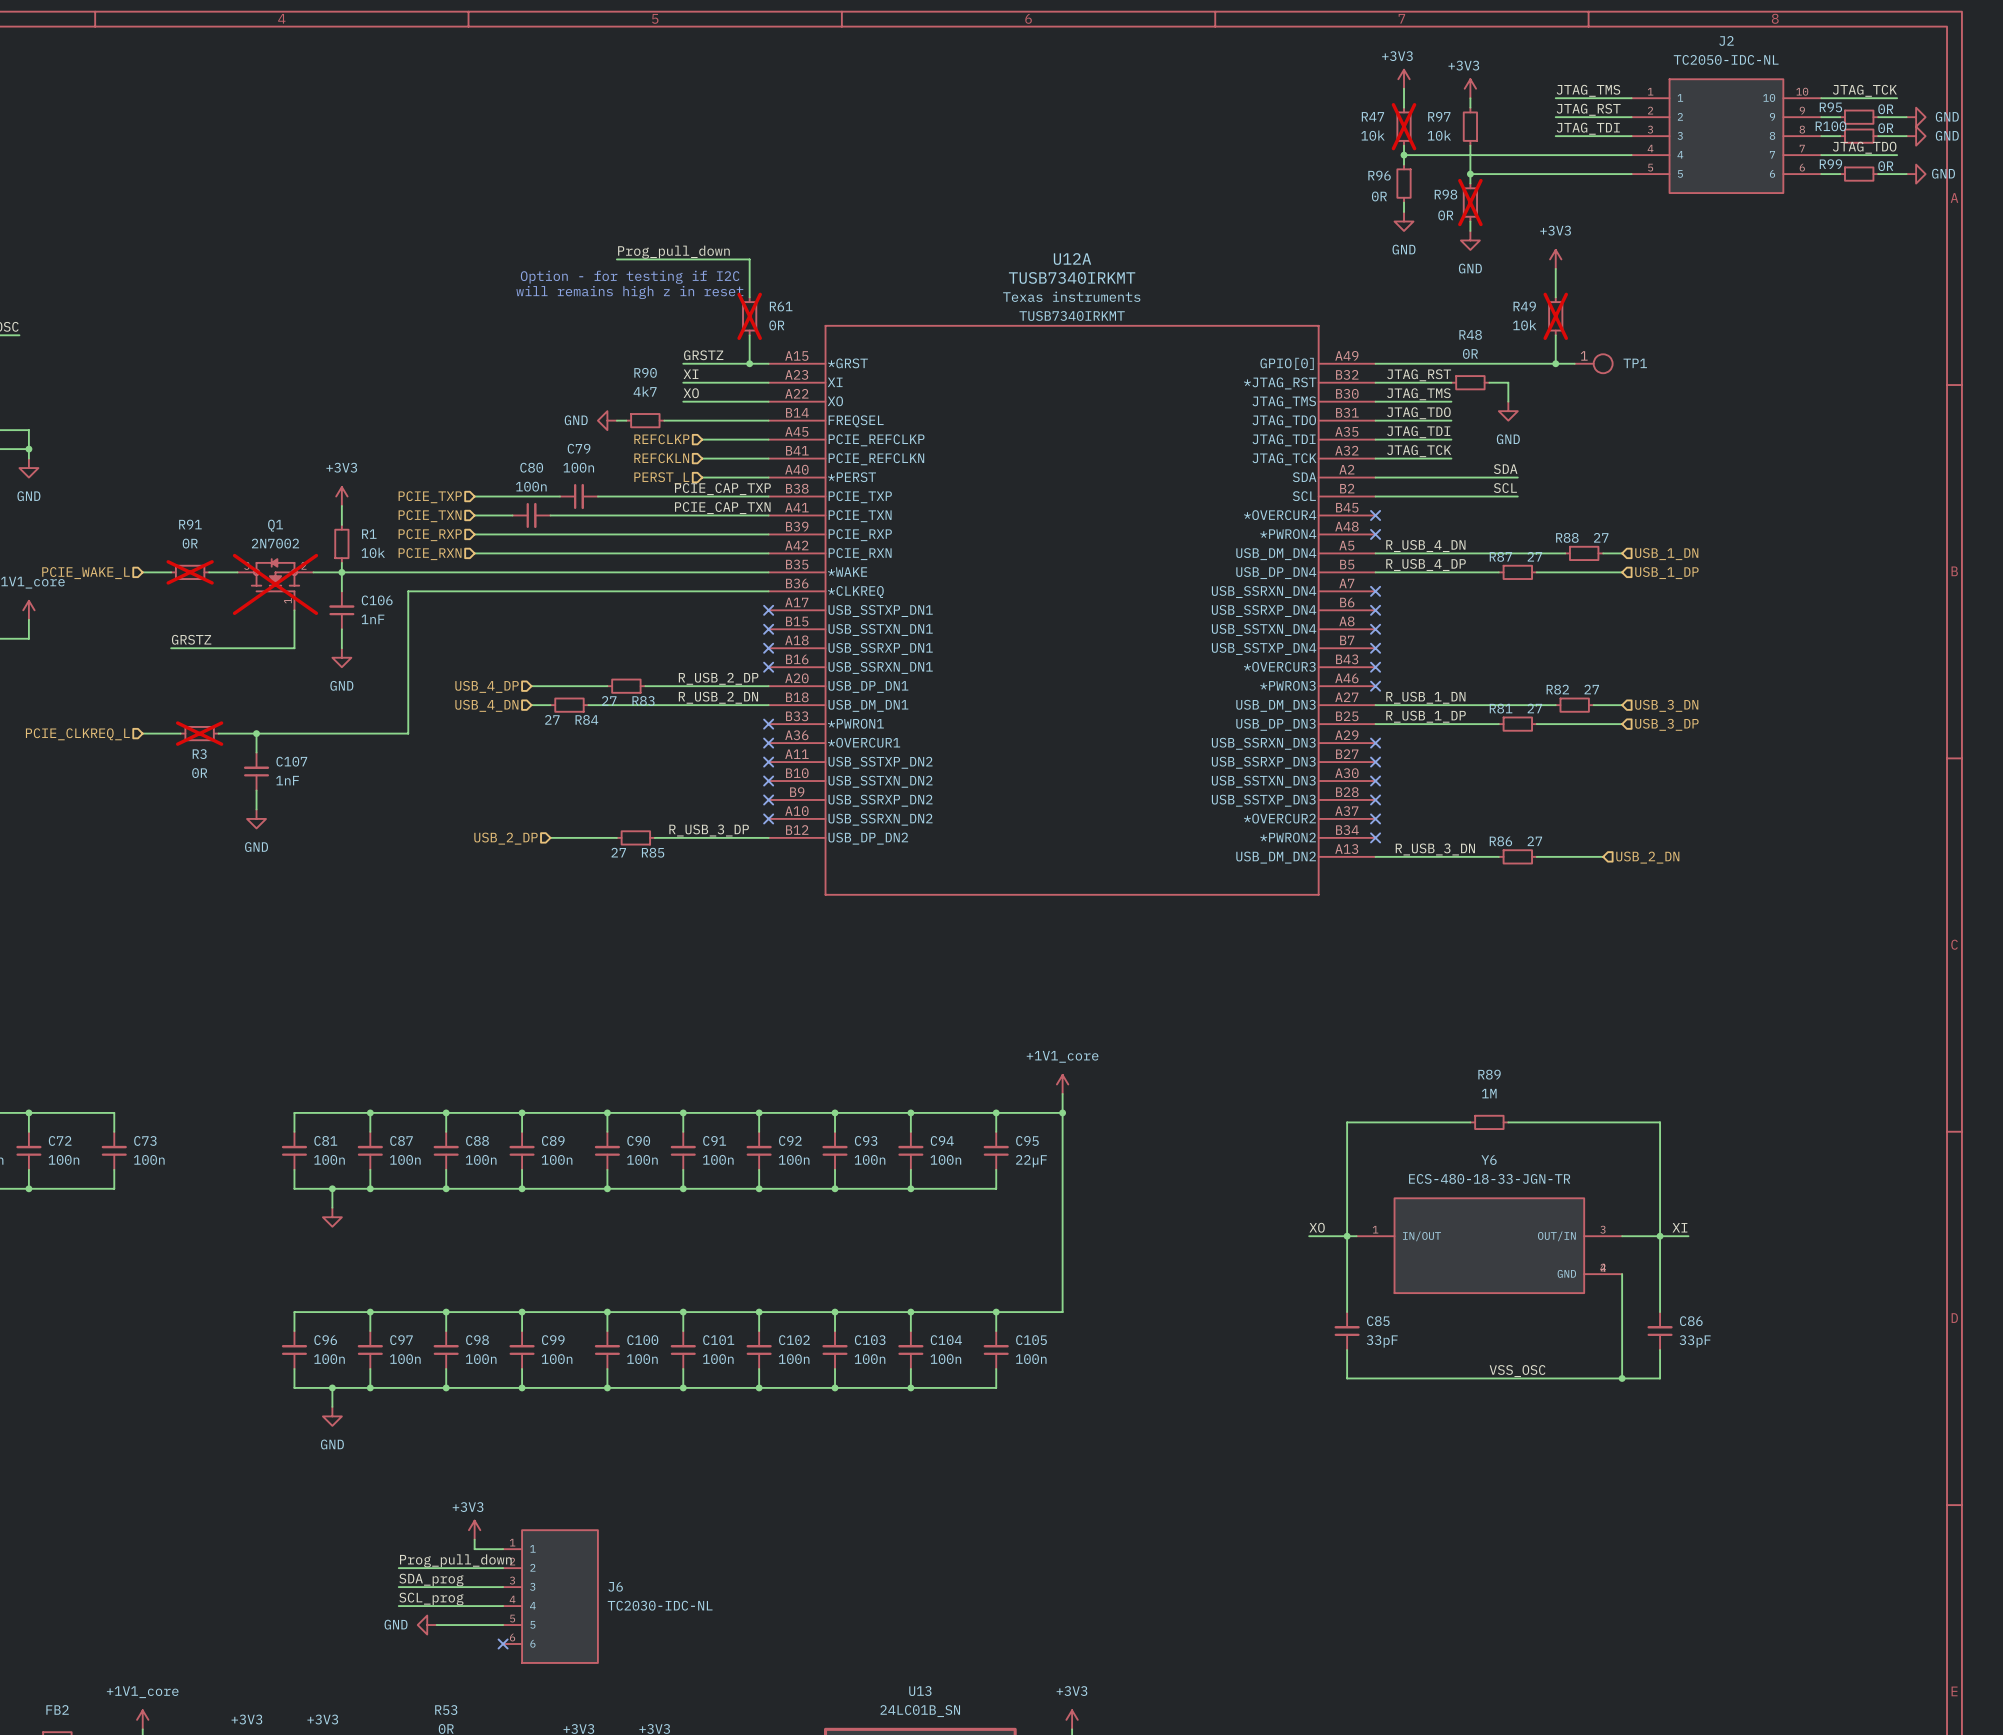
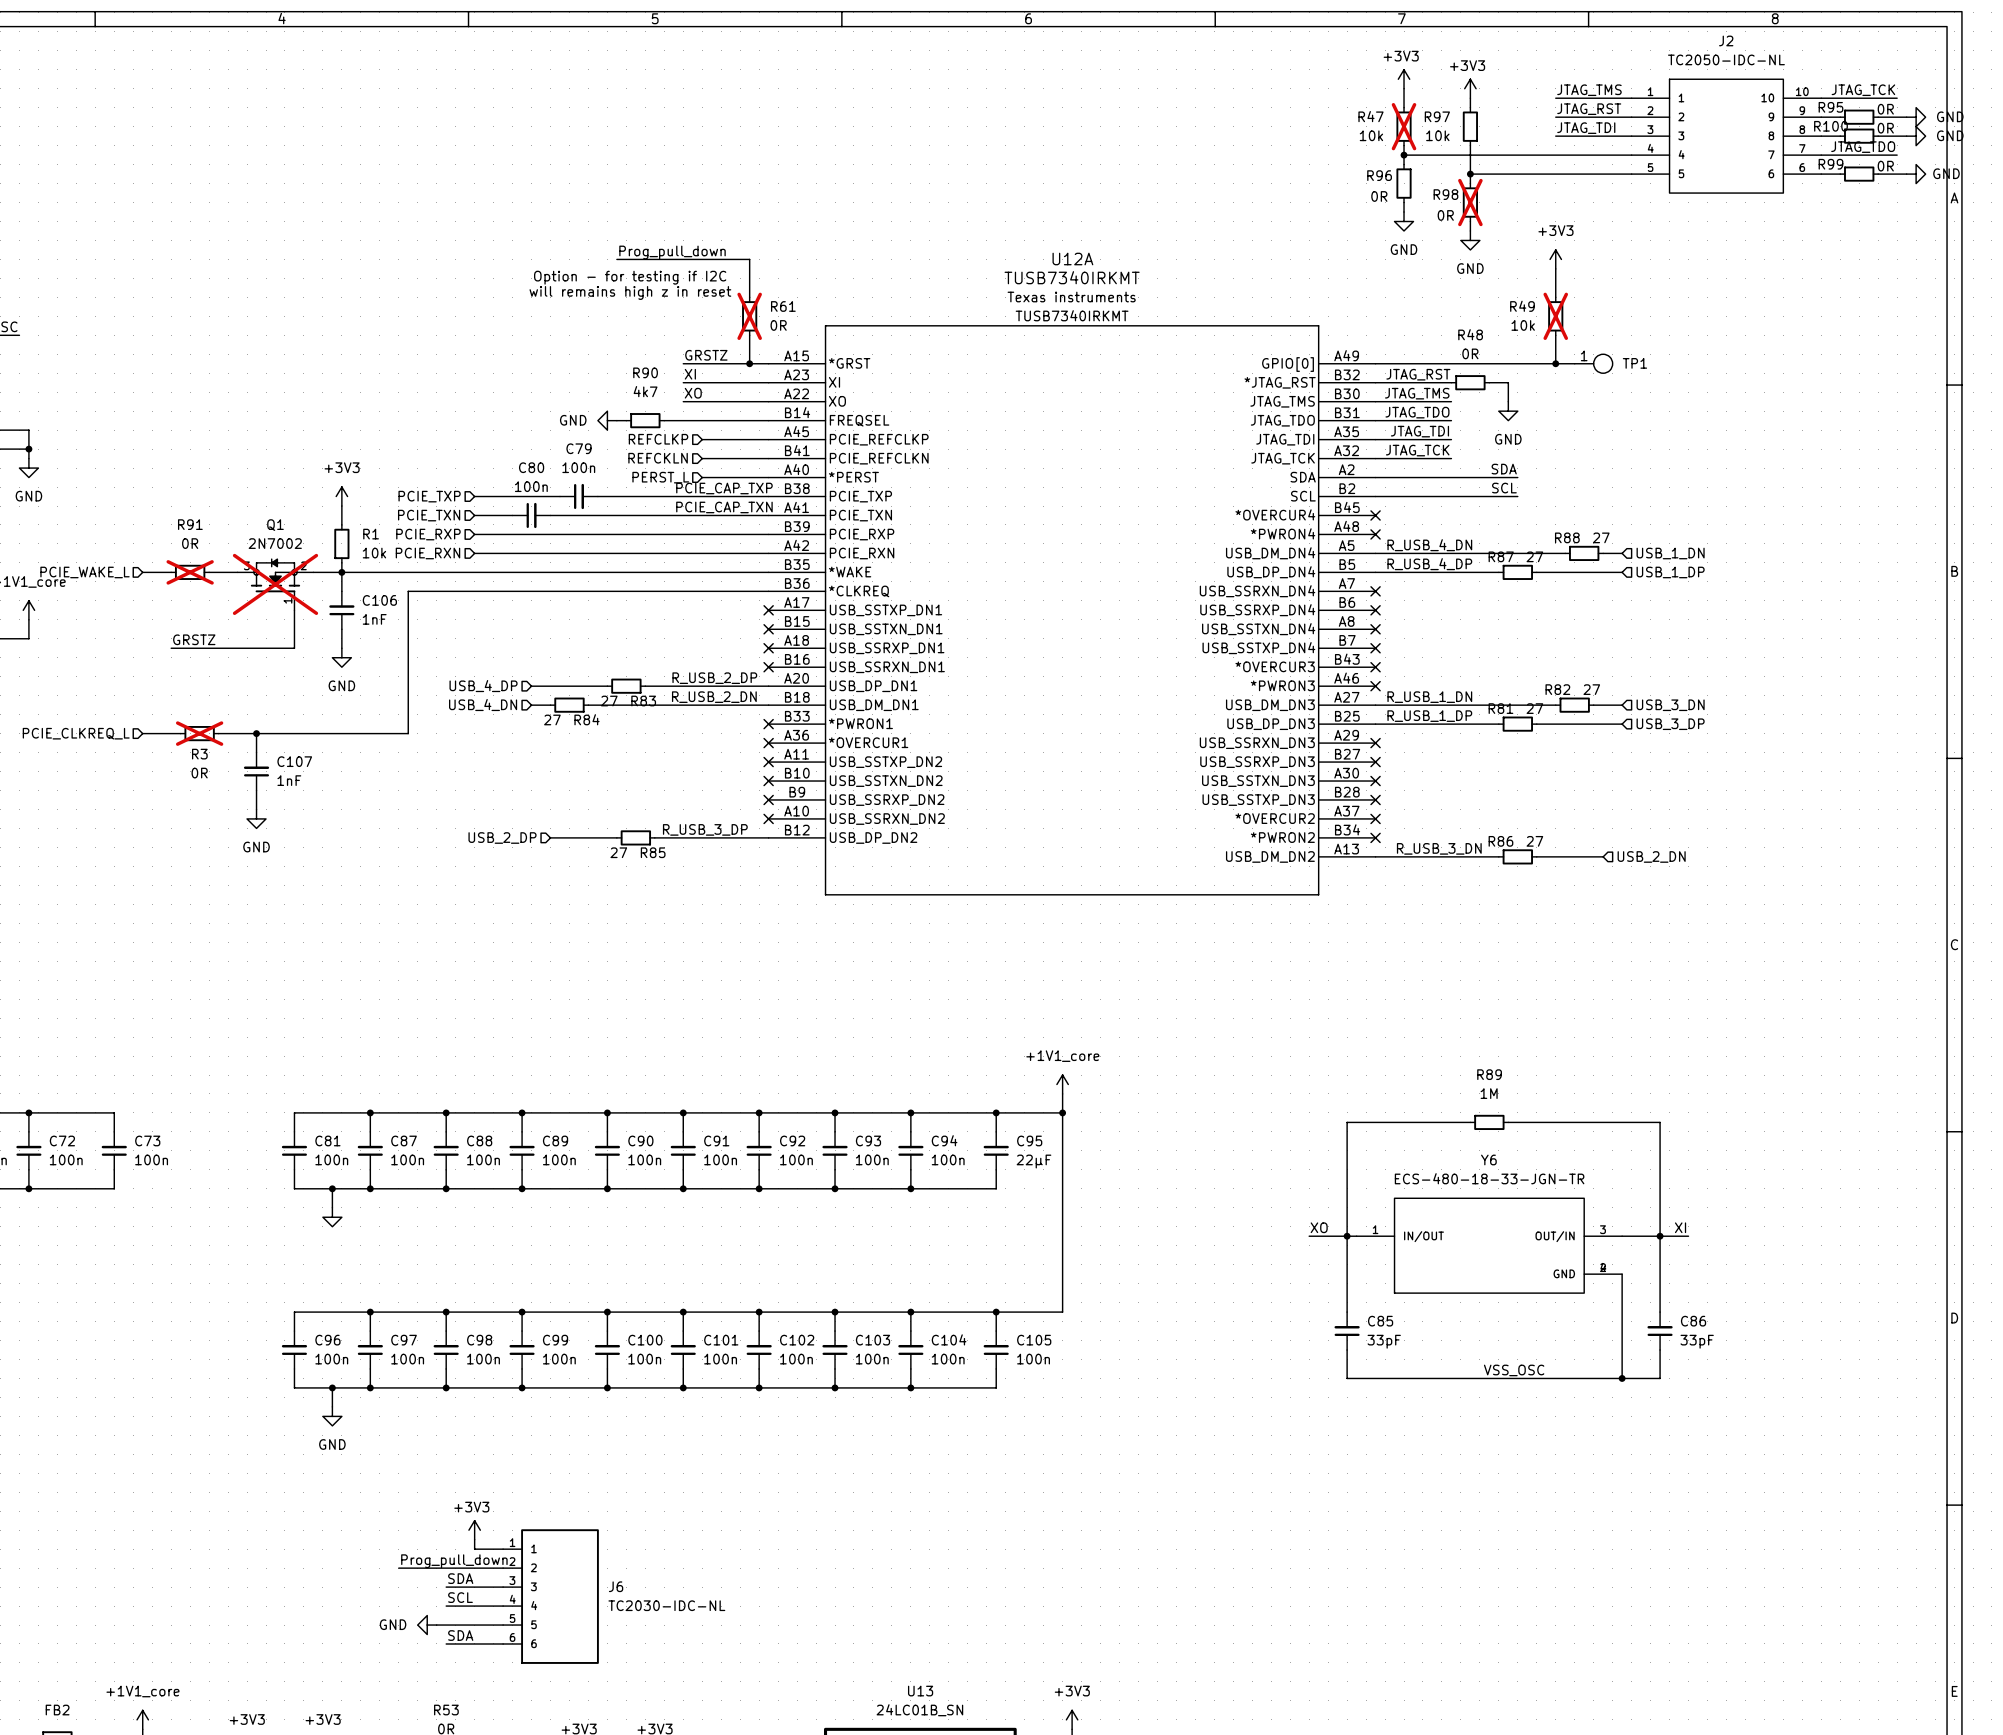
label: none -> SDA (460, 1578)
label: SDA_prog (431, 1579) -> none
wire: (398, 1587) (446, 1587) -> none
label: none -> SCL (460, 1597)
label: SCL_prog (431, 1598) -> none
wire: (398, 1606) (446, 1606) -> none
label: none -> SDA (460, 1635)
wire: none -> (446, 1643) (503, 1643)
no-connect mark: (503, 1643) -> none

